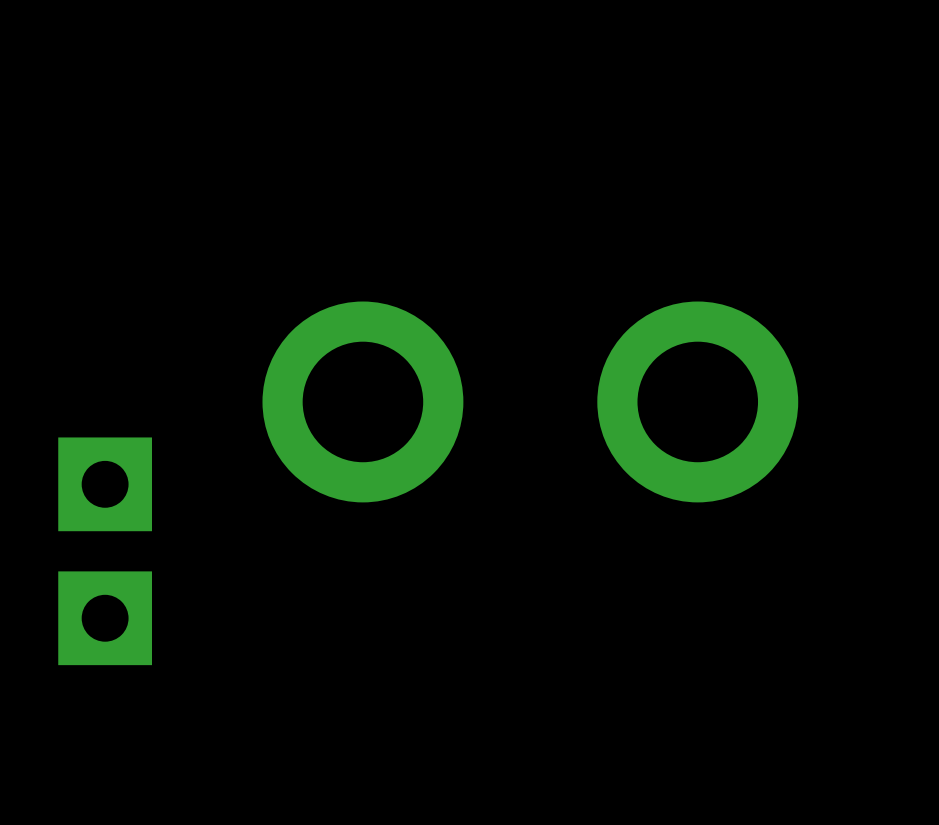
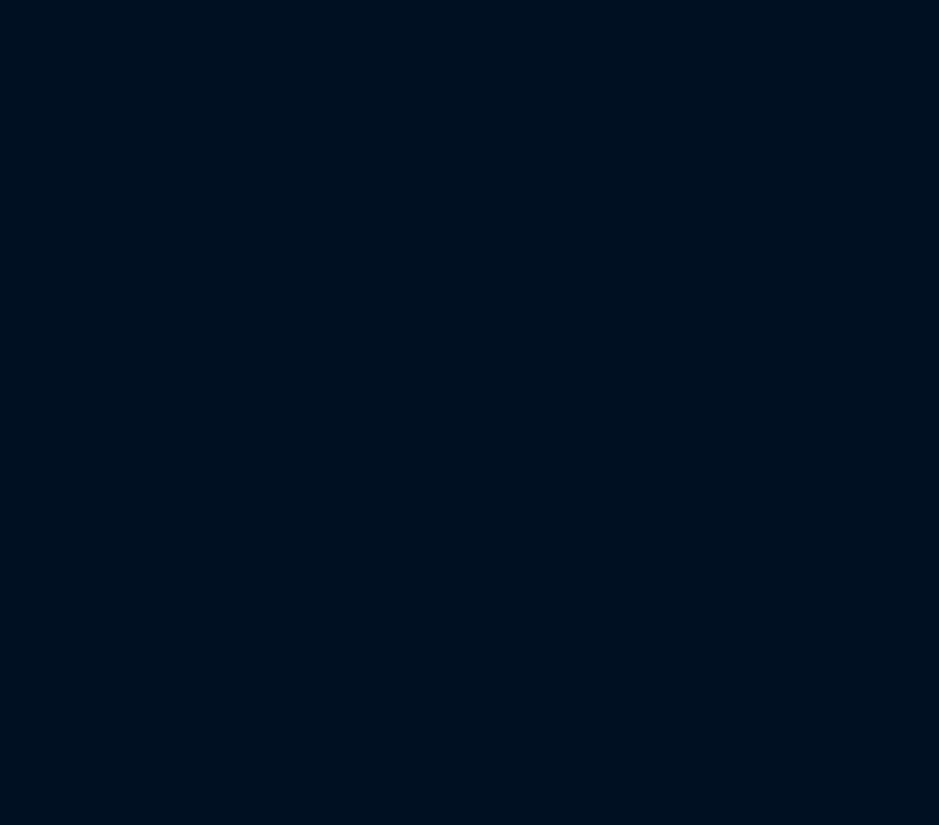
part: (428, 483) -> none

